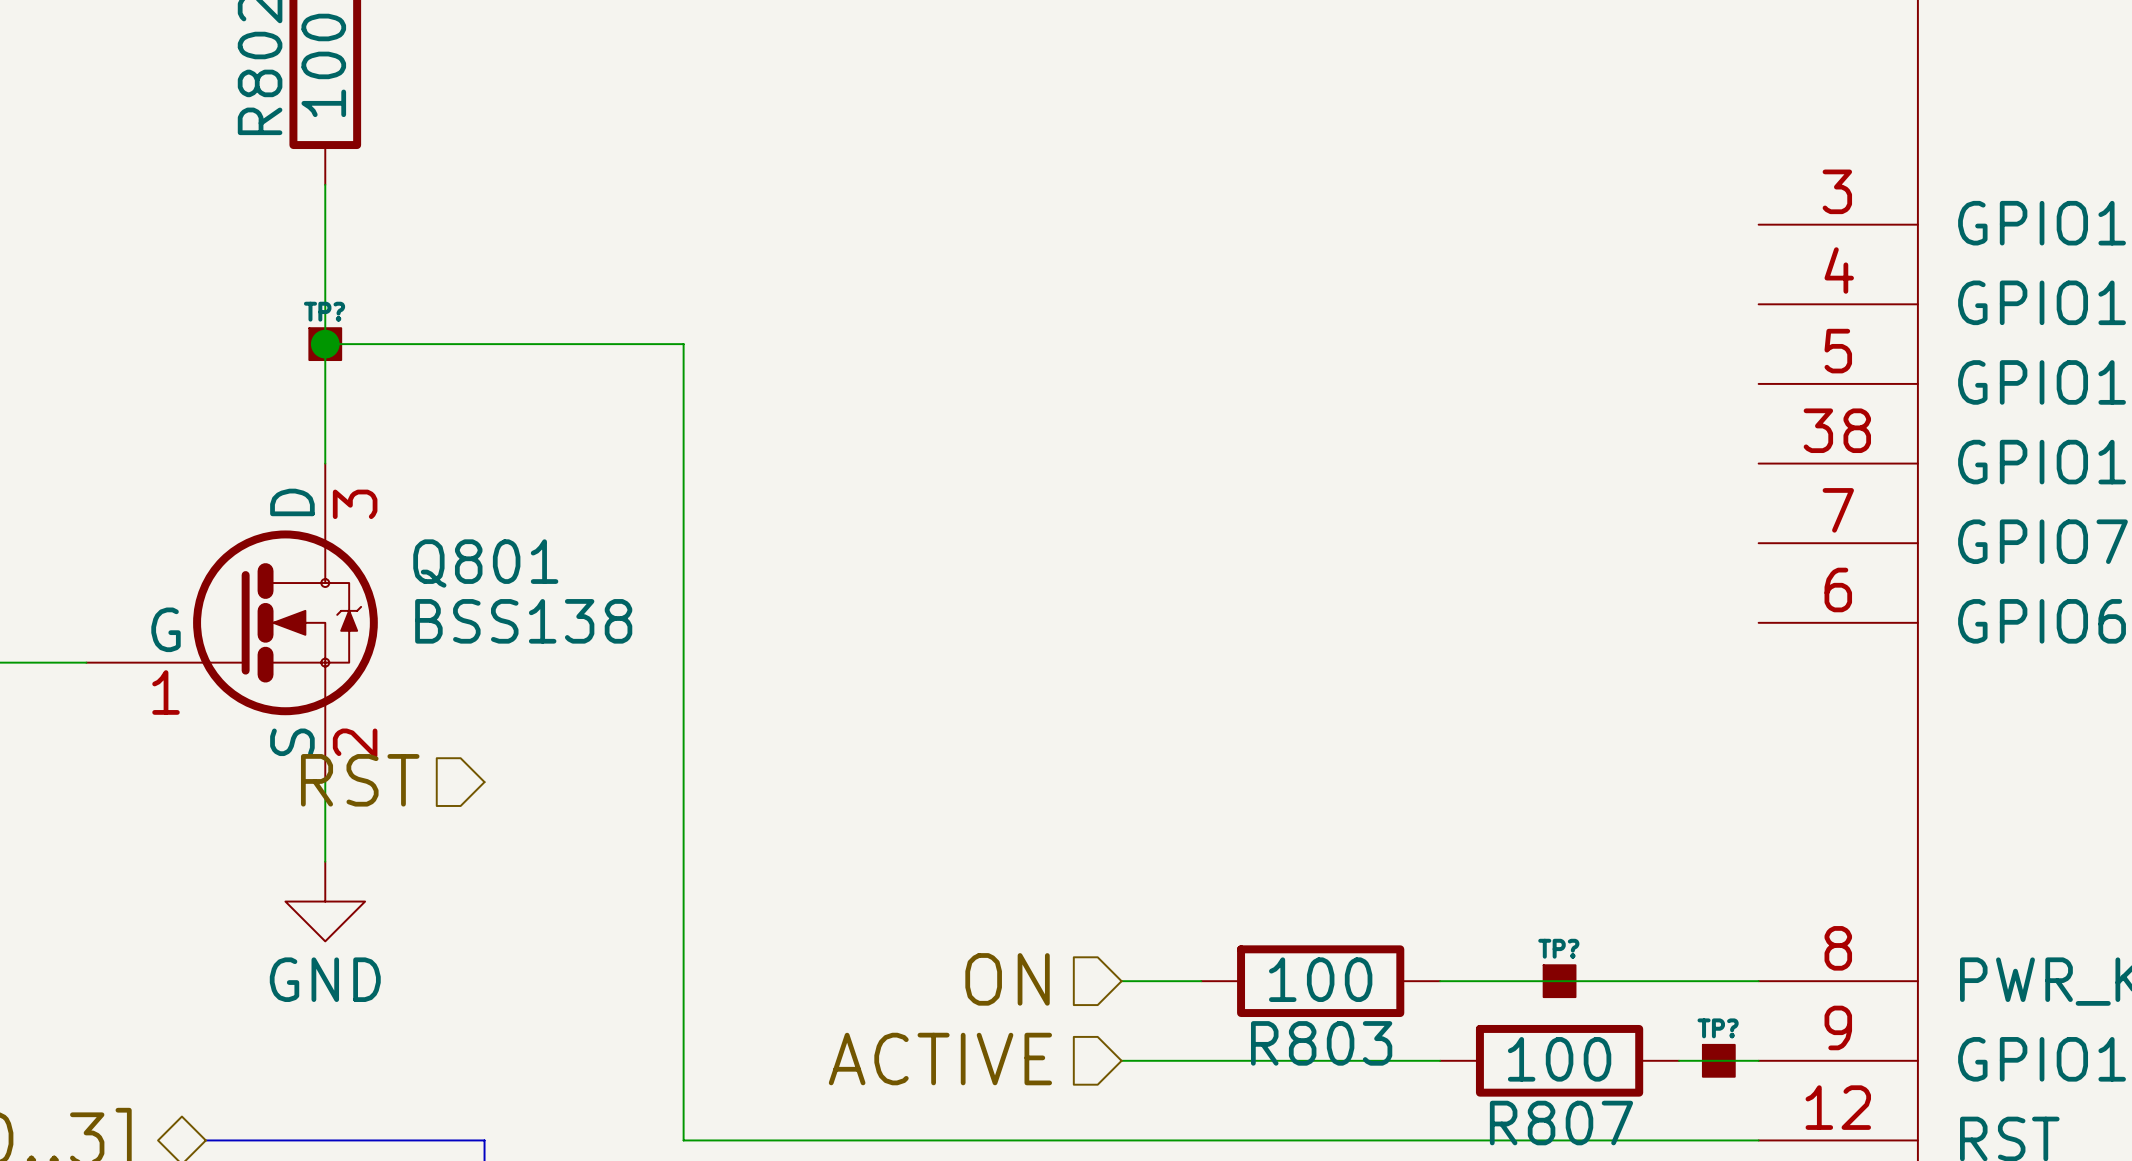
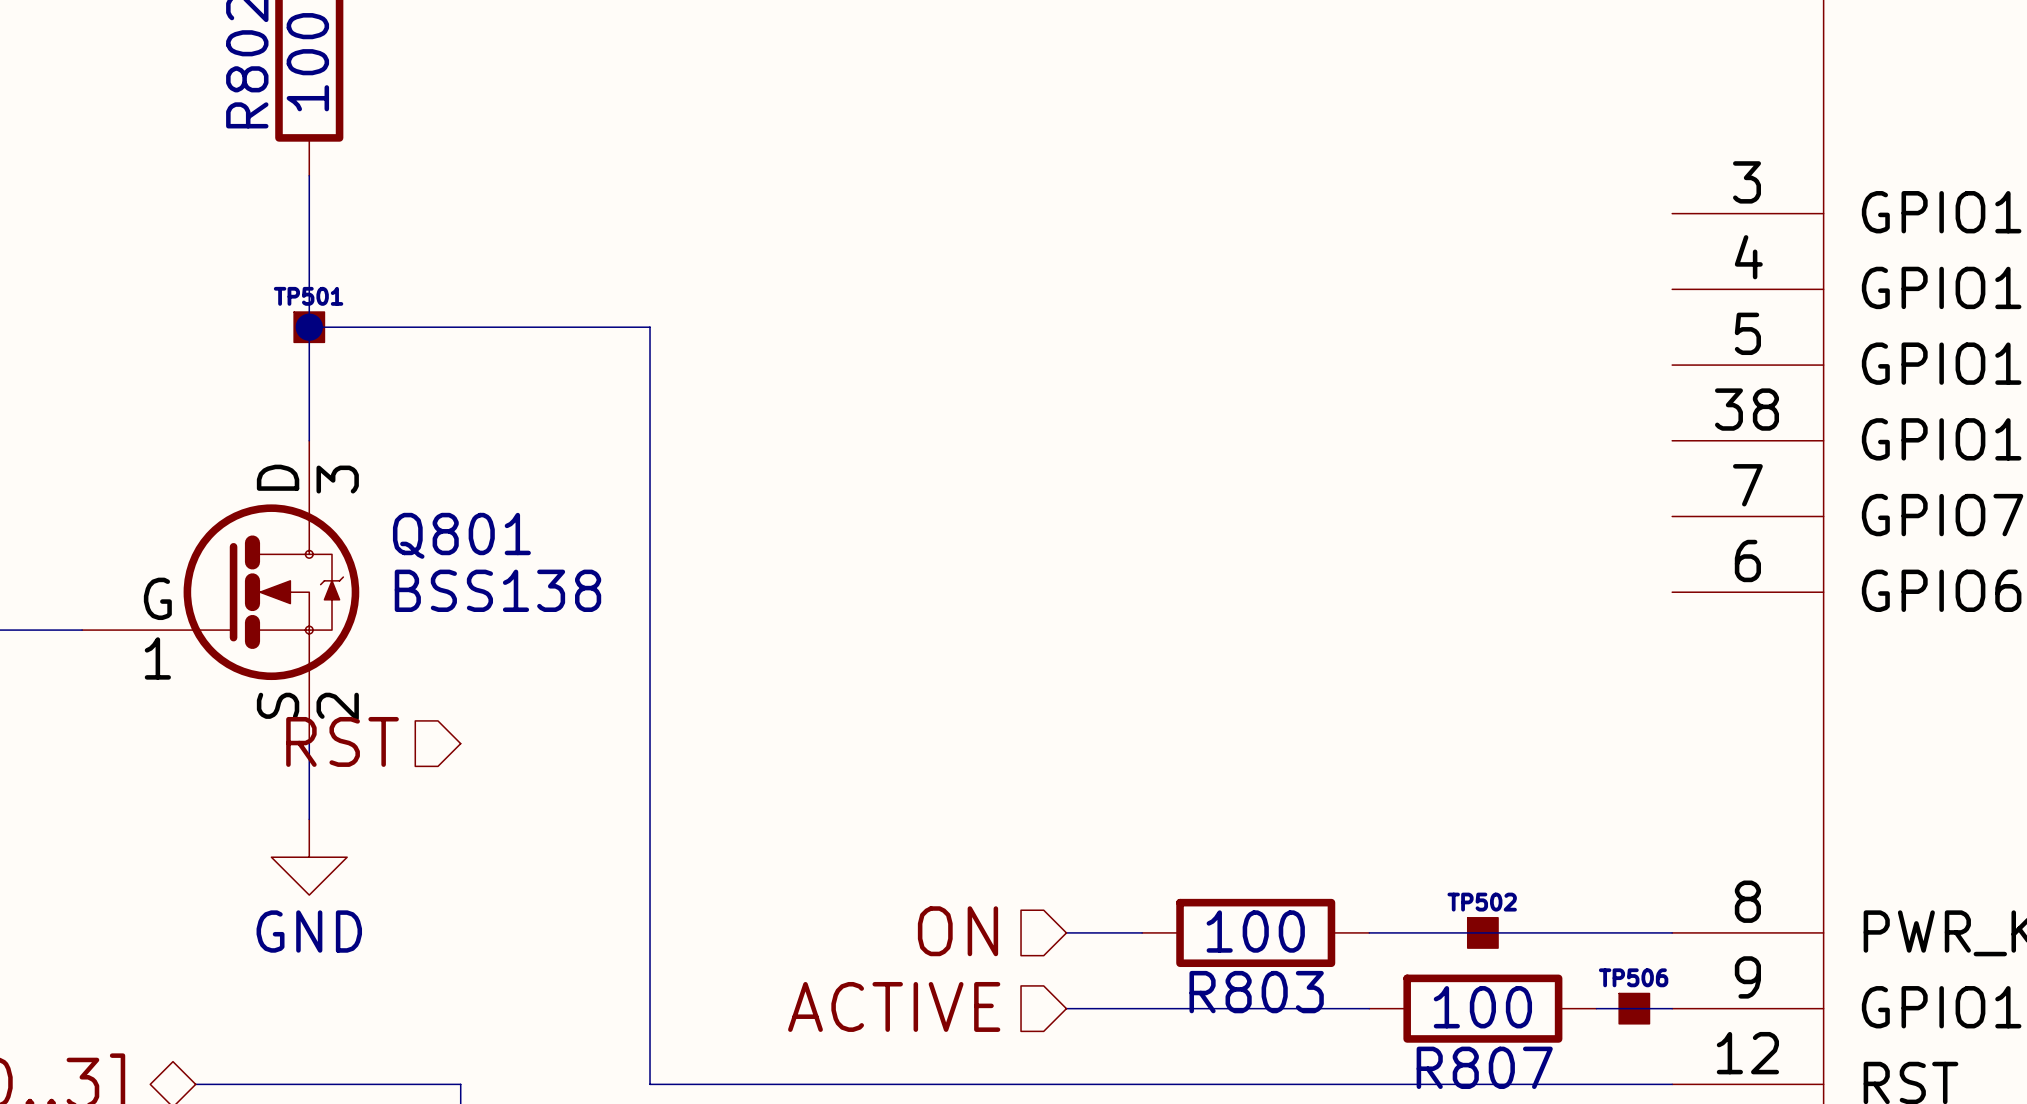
TP? name: TP? (324, 311) -> TP501 (308, 296)
TP? name: TP? (1558, 948) -> TP502 (1482, 902)
TP? name: TP? (1718, 1028) -> TP506 (1633, 977)

